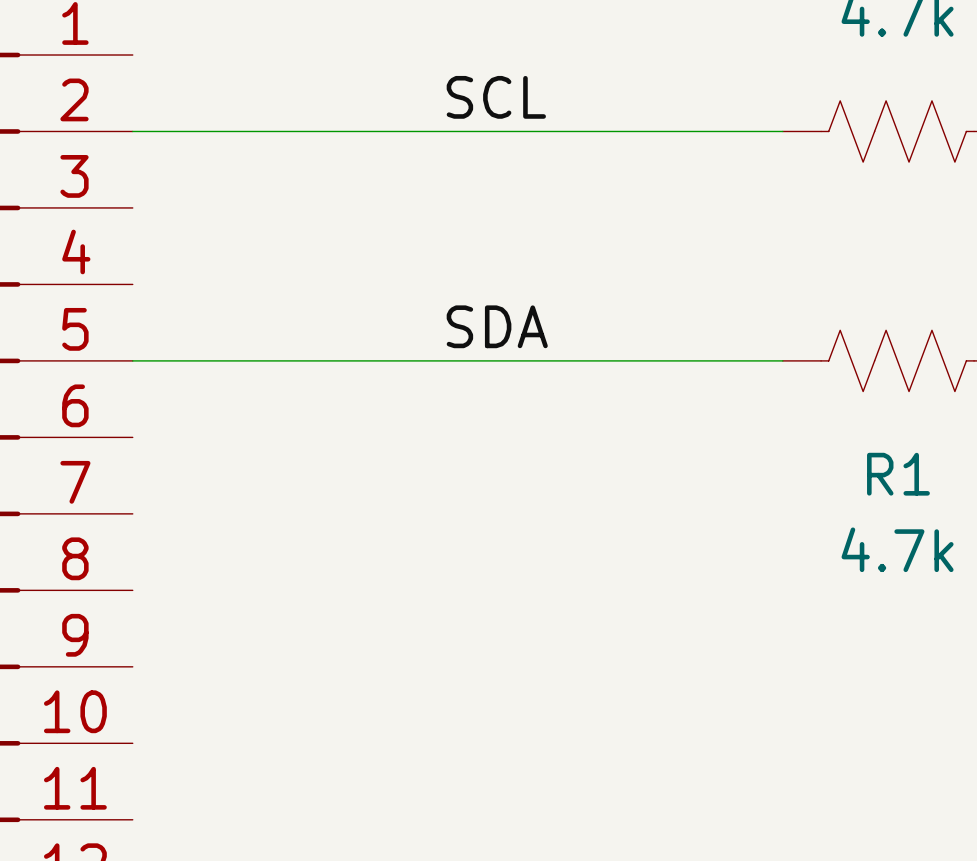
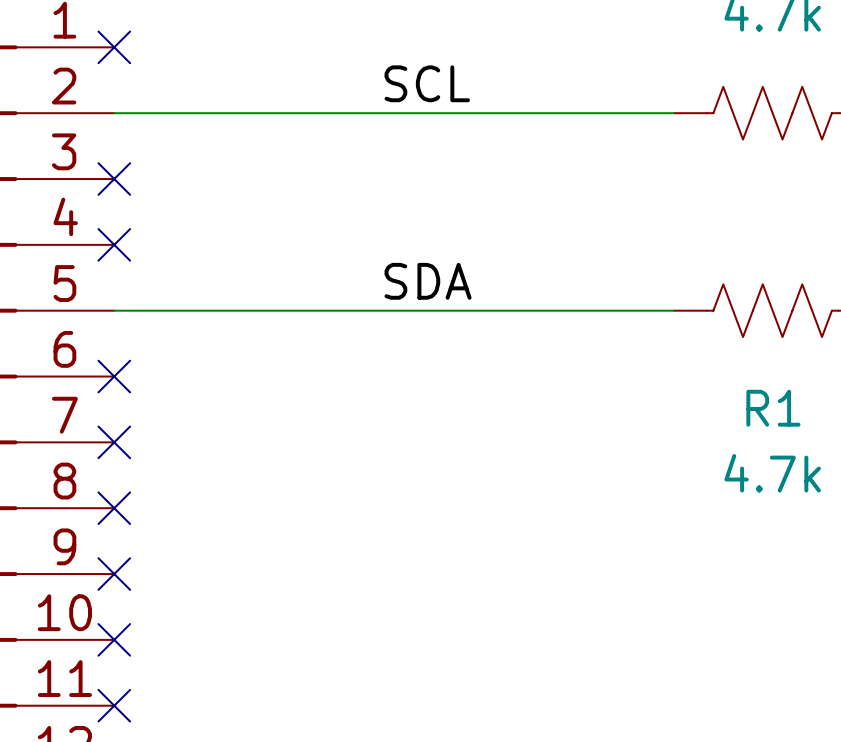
no-connect mark: none -> (114, 47)
no-connect mark: none -> (114, 179)
no-connect mark: none -> (114, 244)
no-connect mark: none -> (114, 376)
no-connect mark: none -> (114, 442)
no-connect mark: none -> (114, 508)
no-connect mark: none -> (114, 574)
no-connect mark: none -> (114, 639)
no-connect mark: none -> (114, 705)

